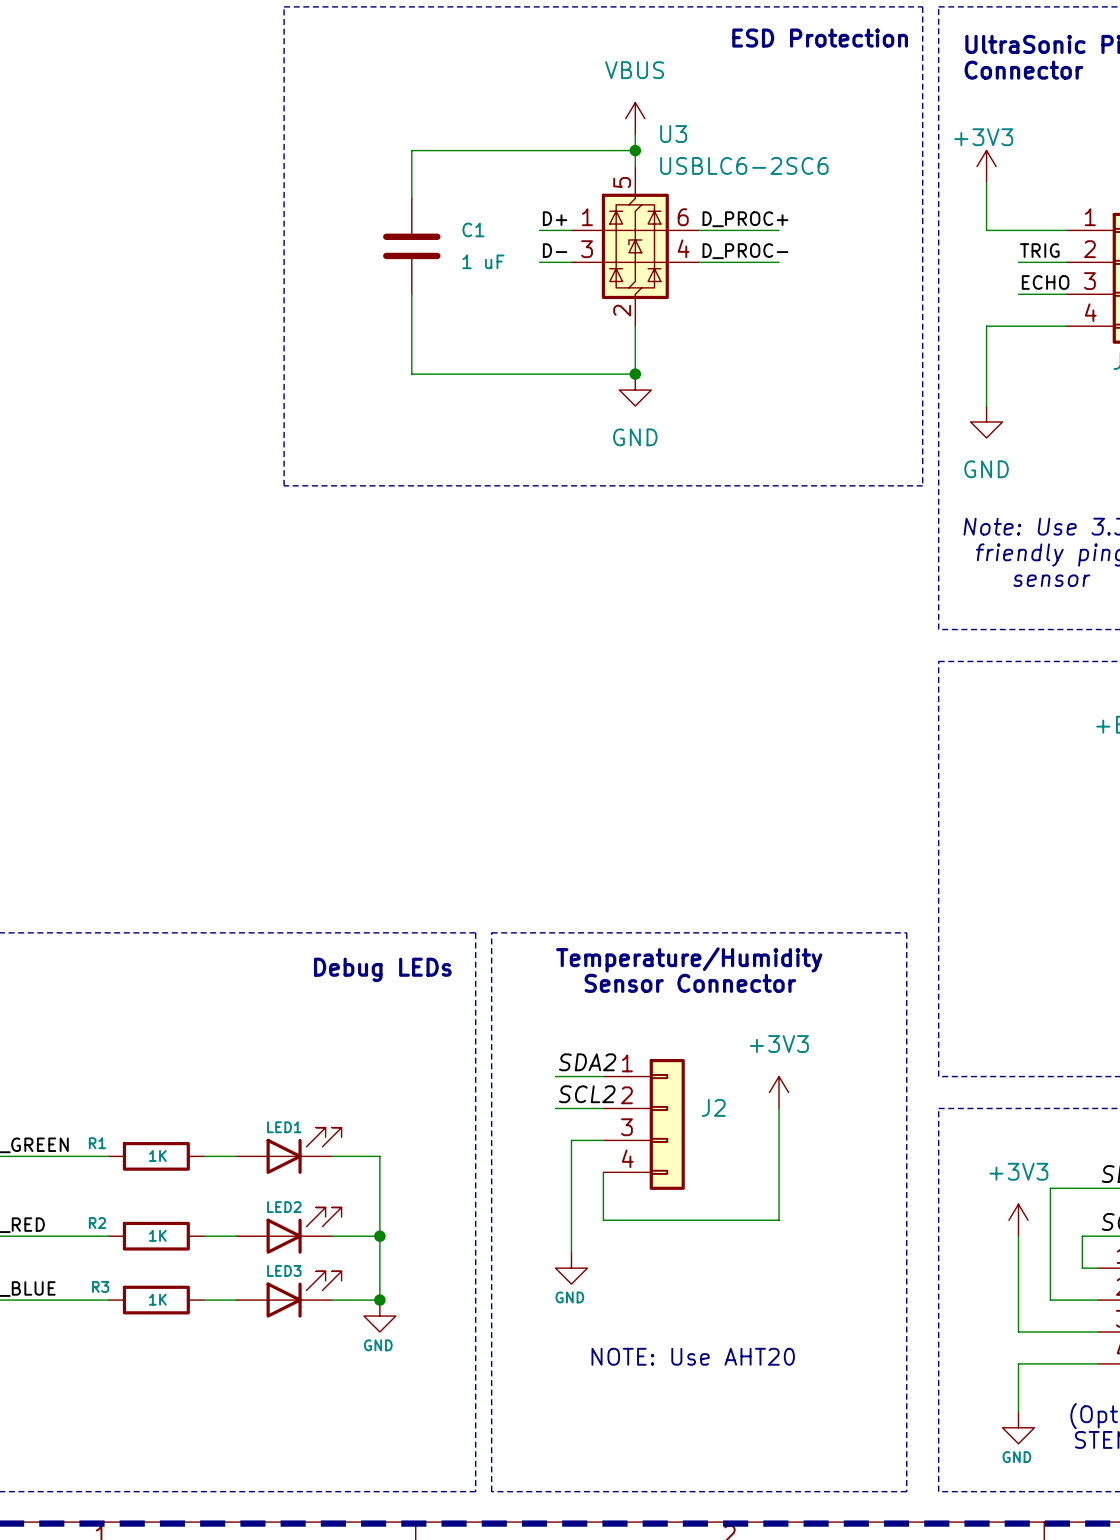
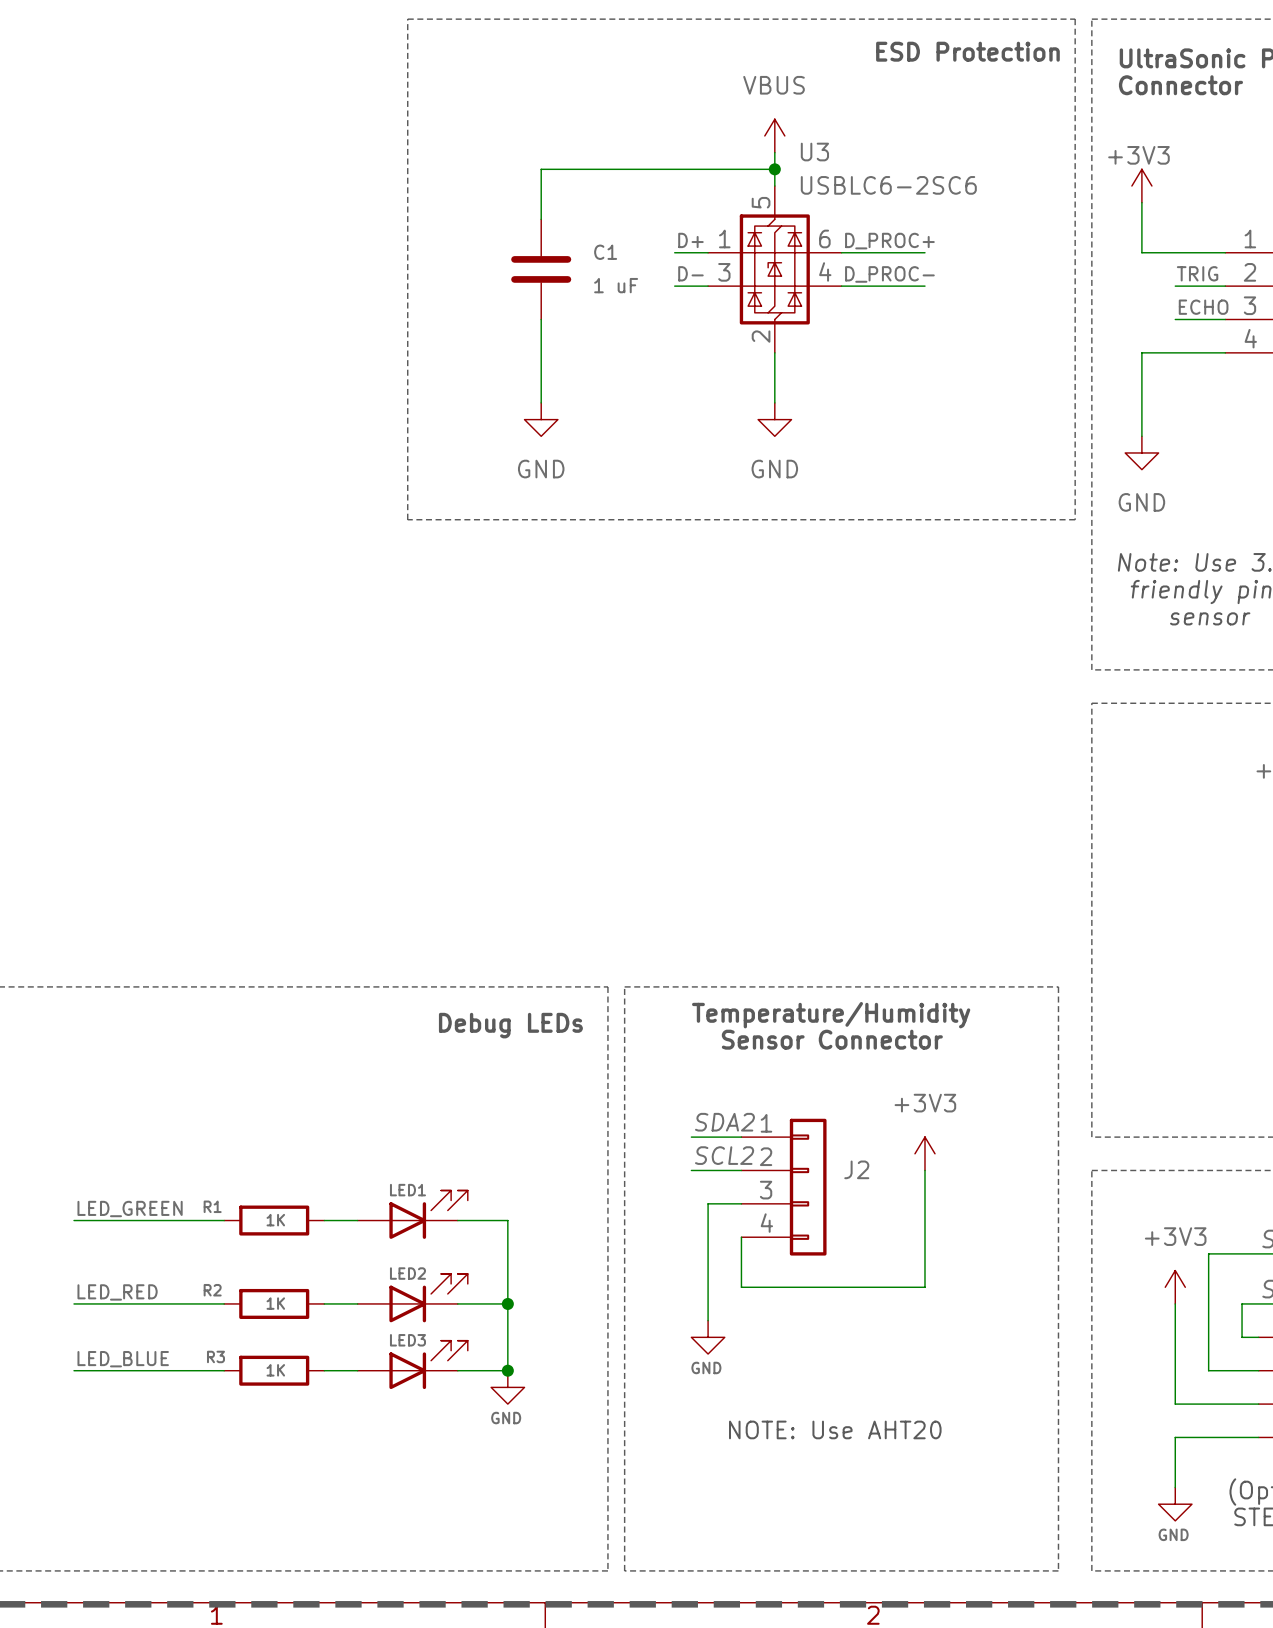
wire: (411, 374) (635, 374) -> none
junction: (635, 374) -> none
power symbol: none -> GND (541, 419)

